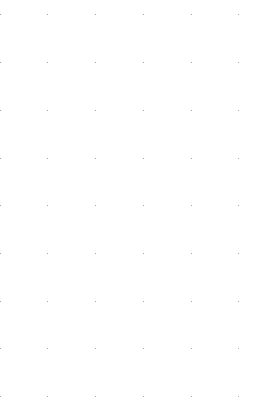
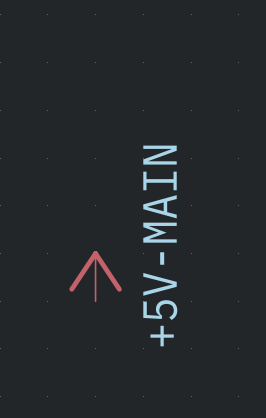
power symbol: none -> +5V-MAIN (95, 276)

